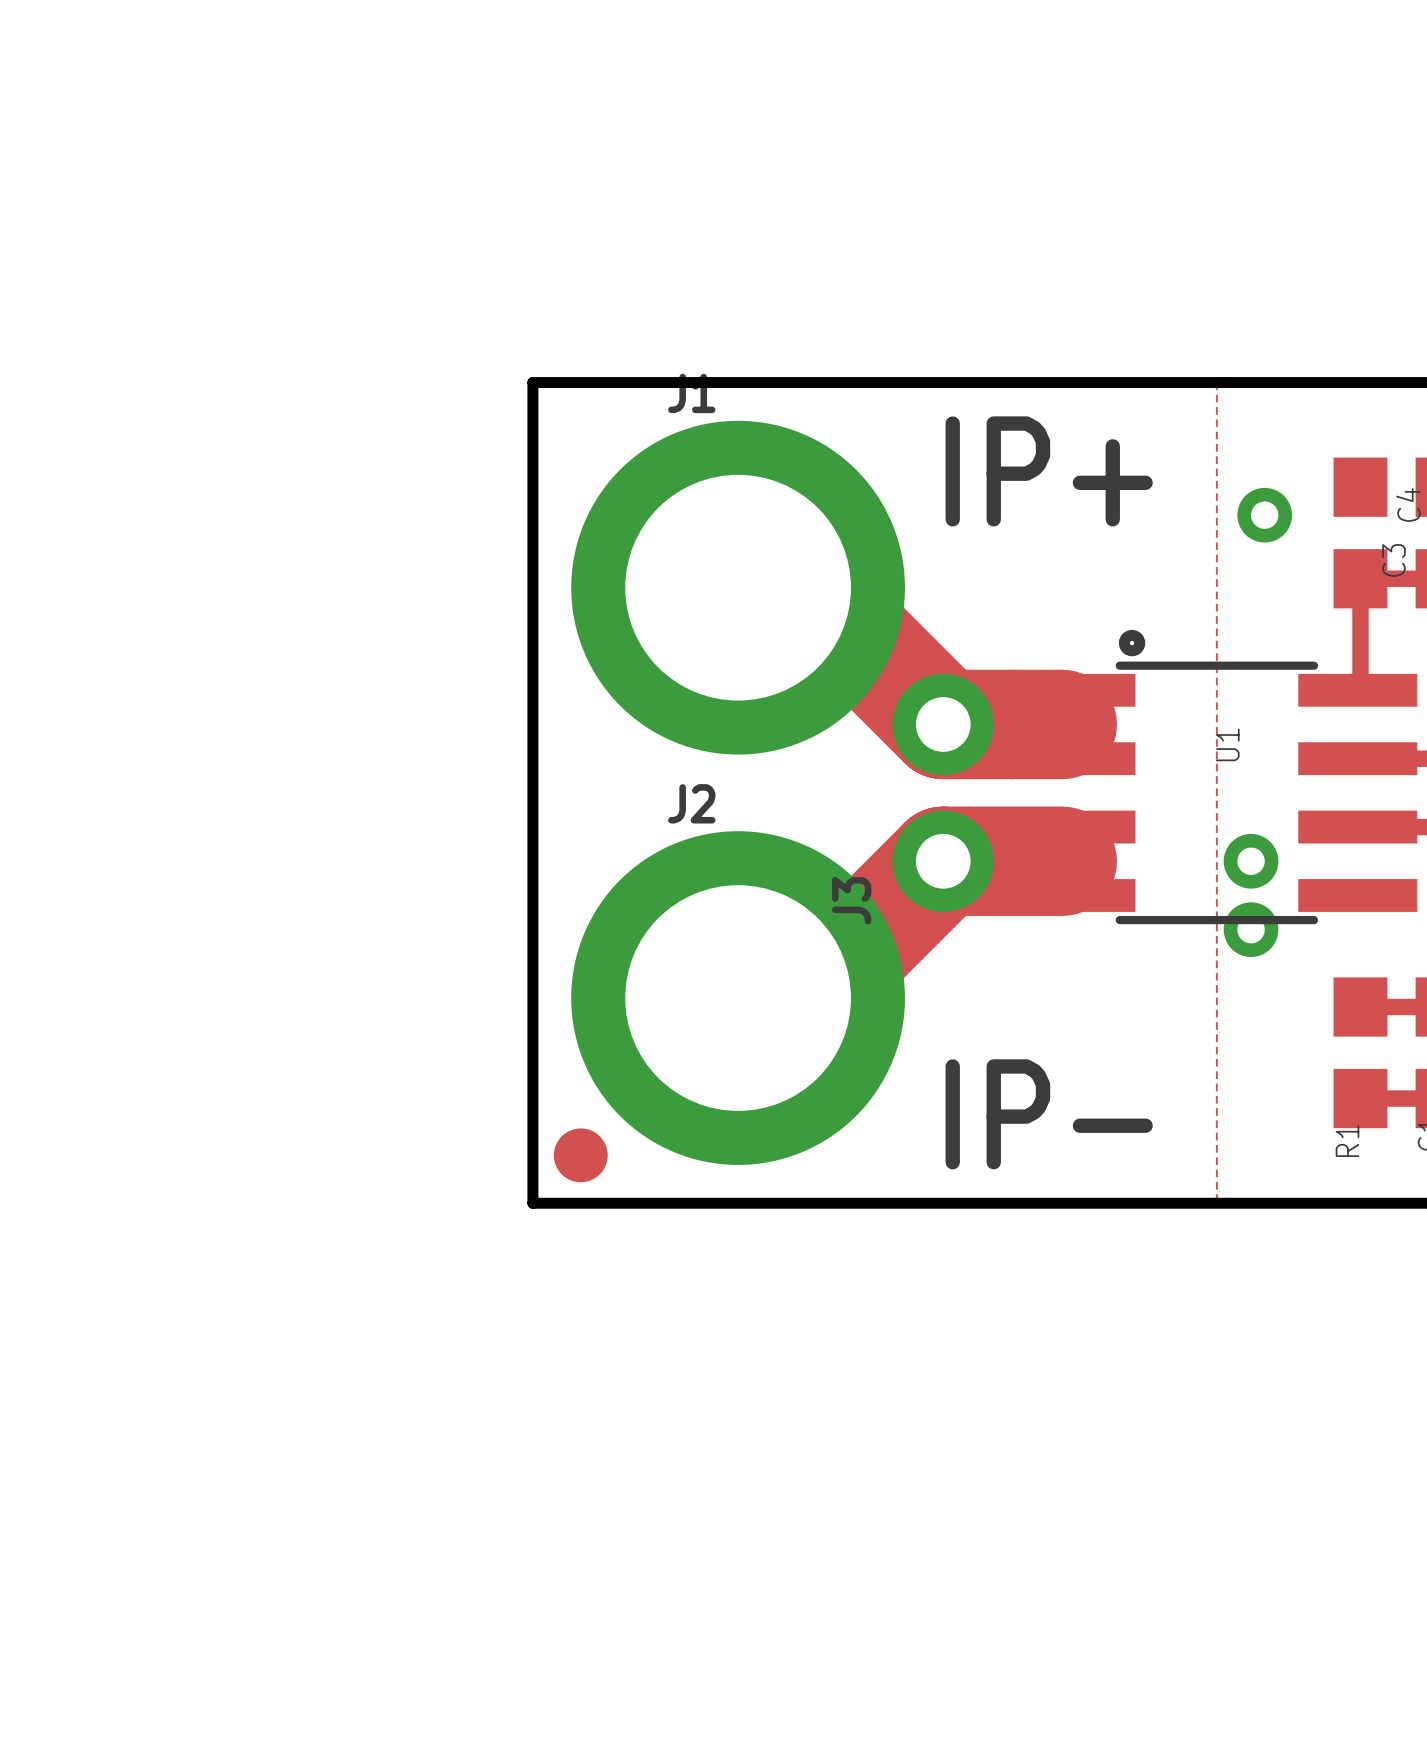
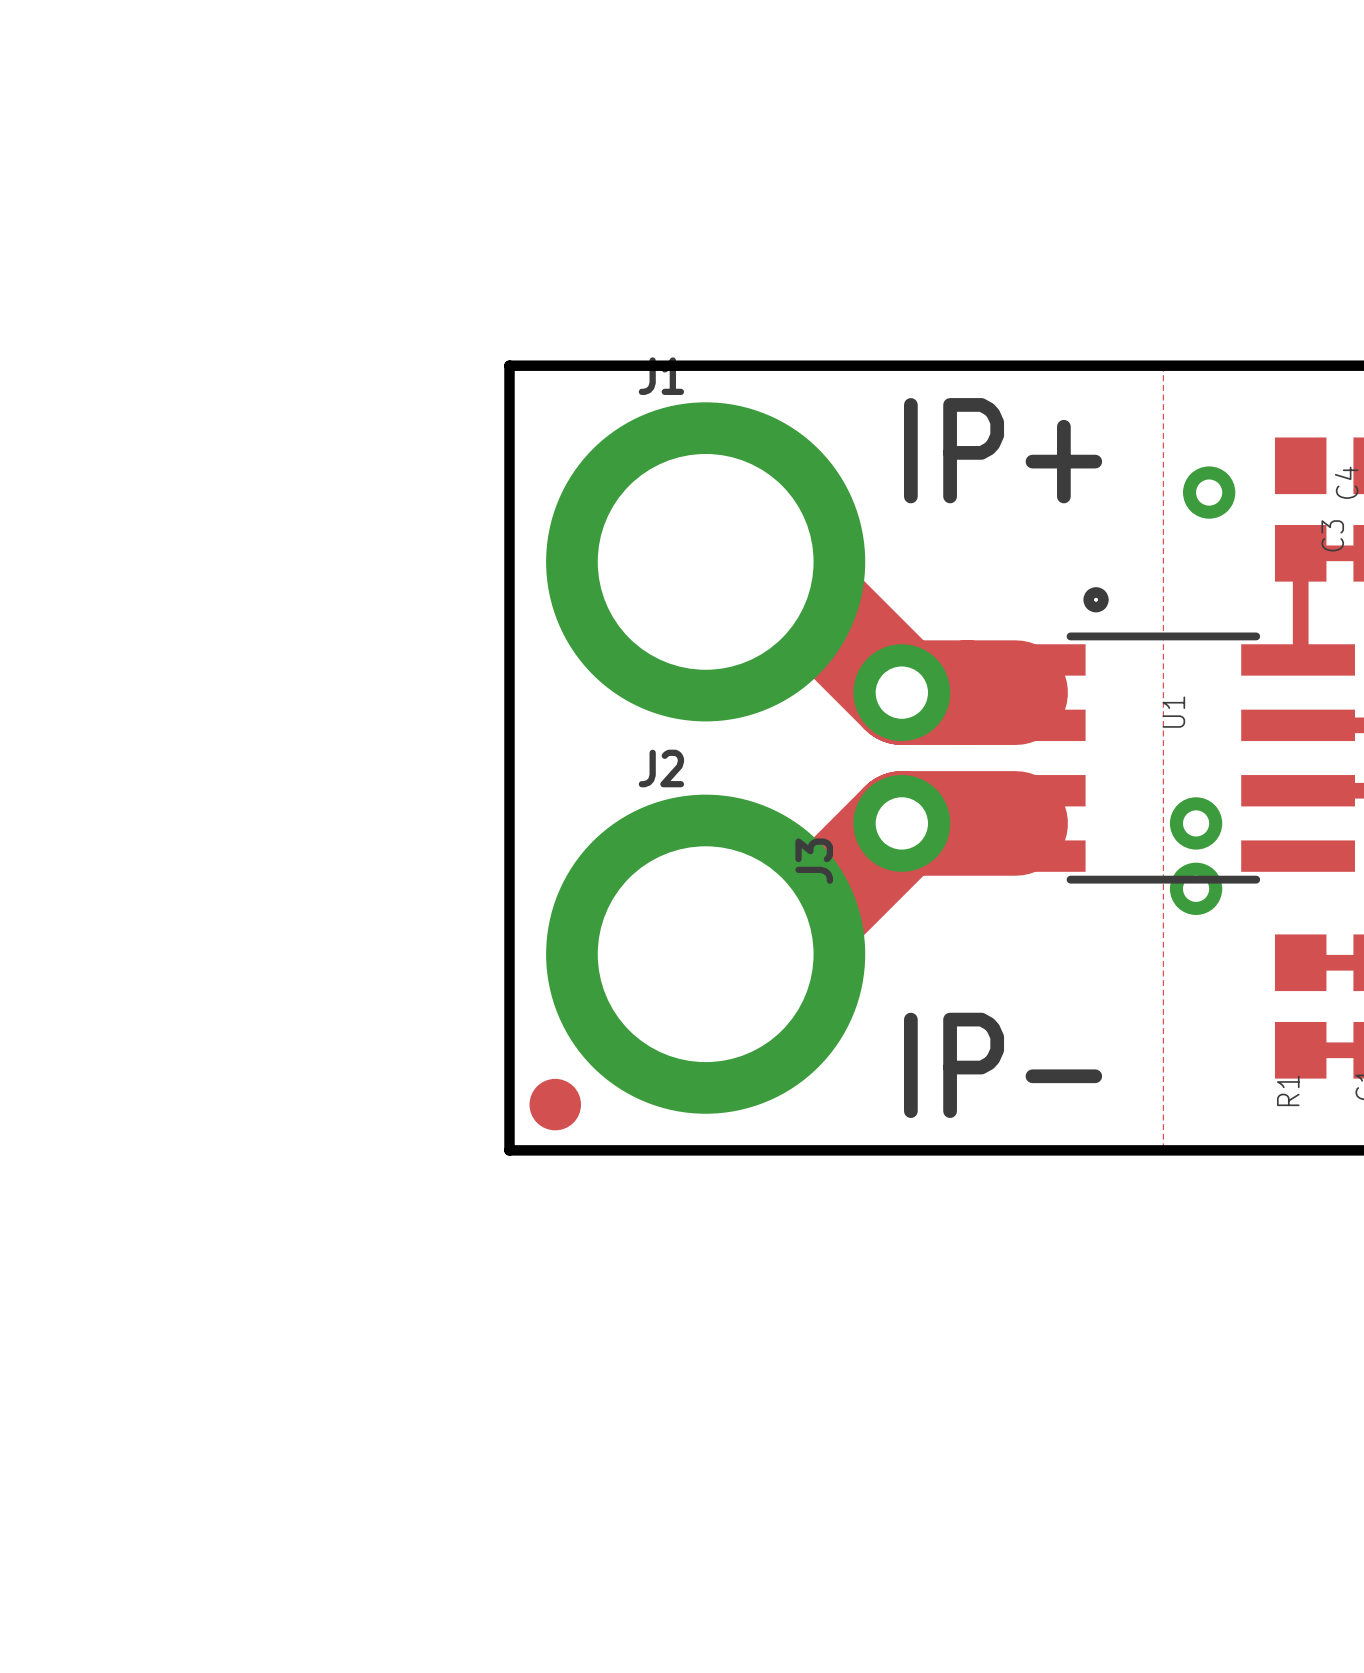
U1 footprint: [1016, 629, 1418, 925] -> [971, 587, 1355, 884]

